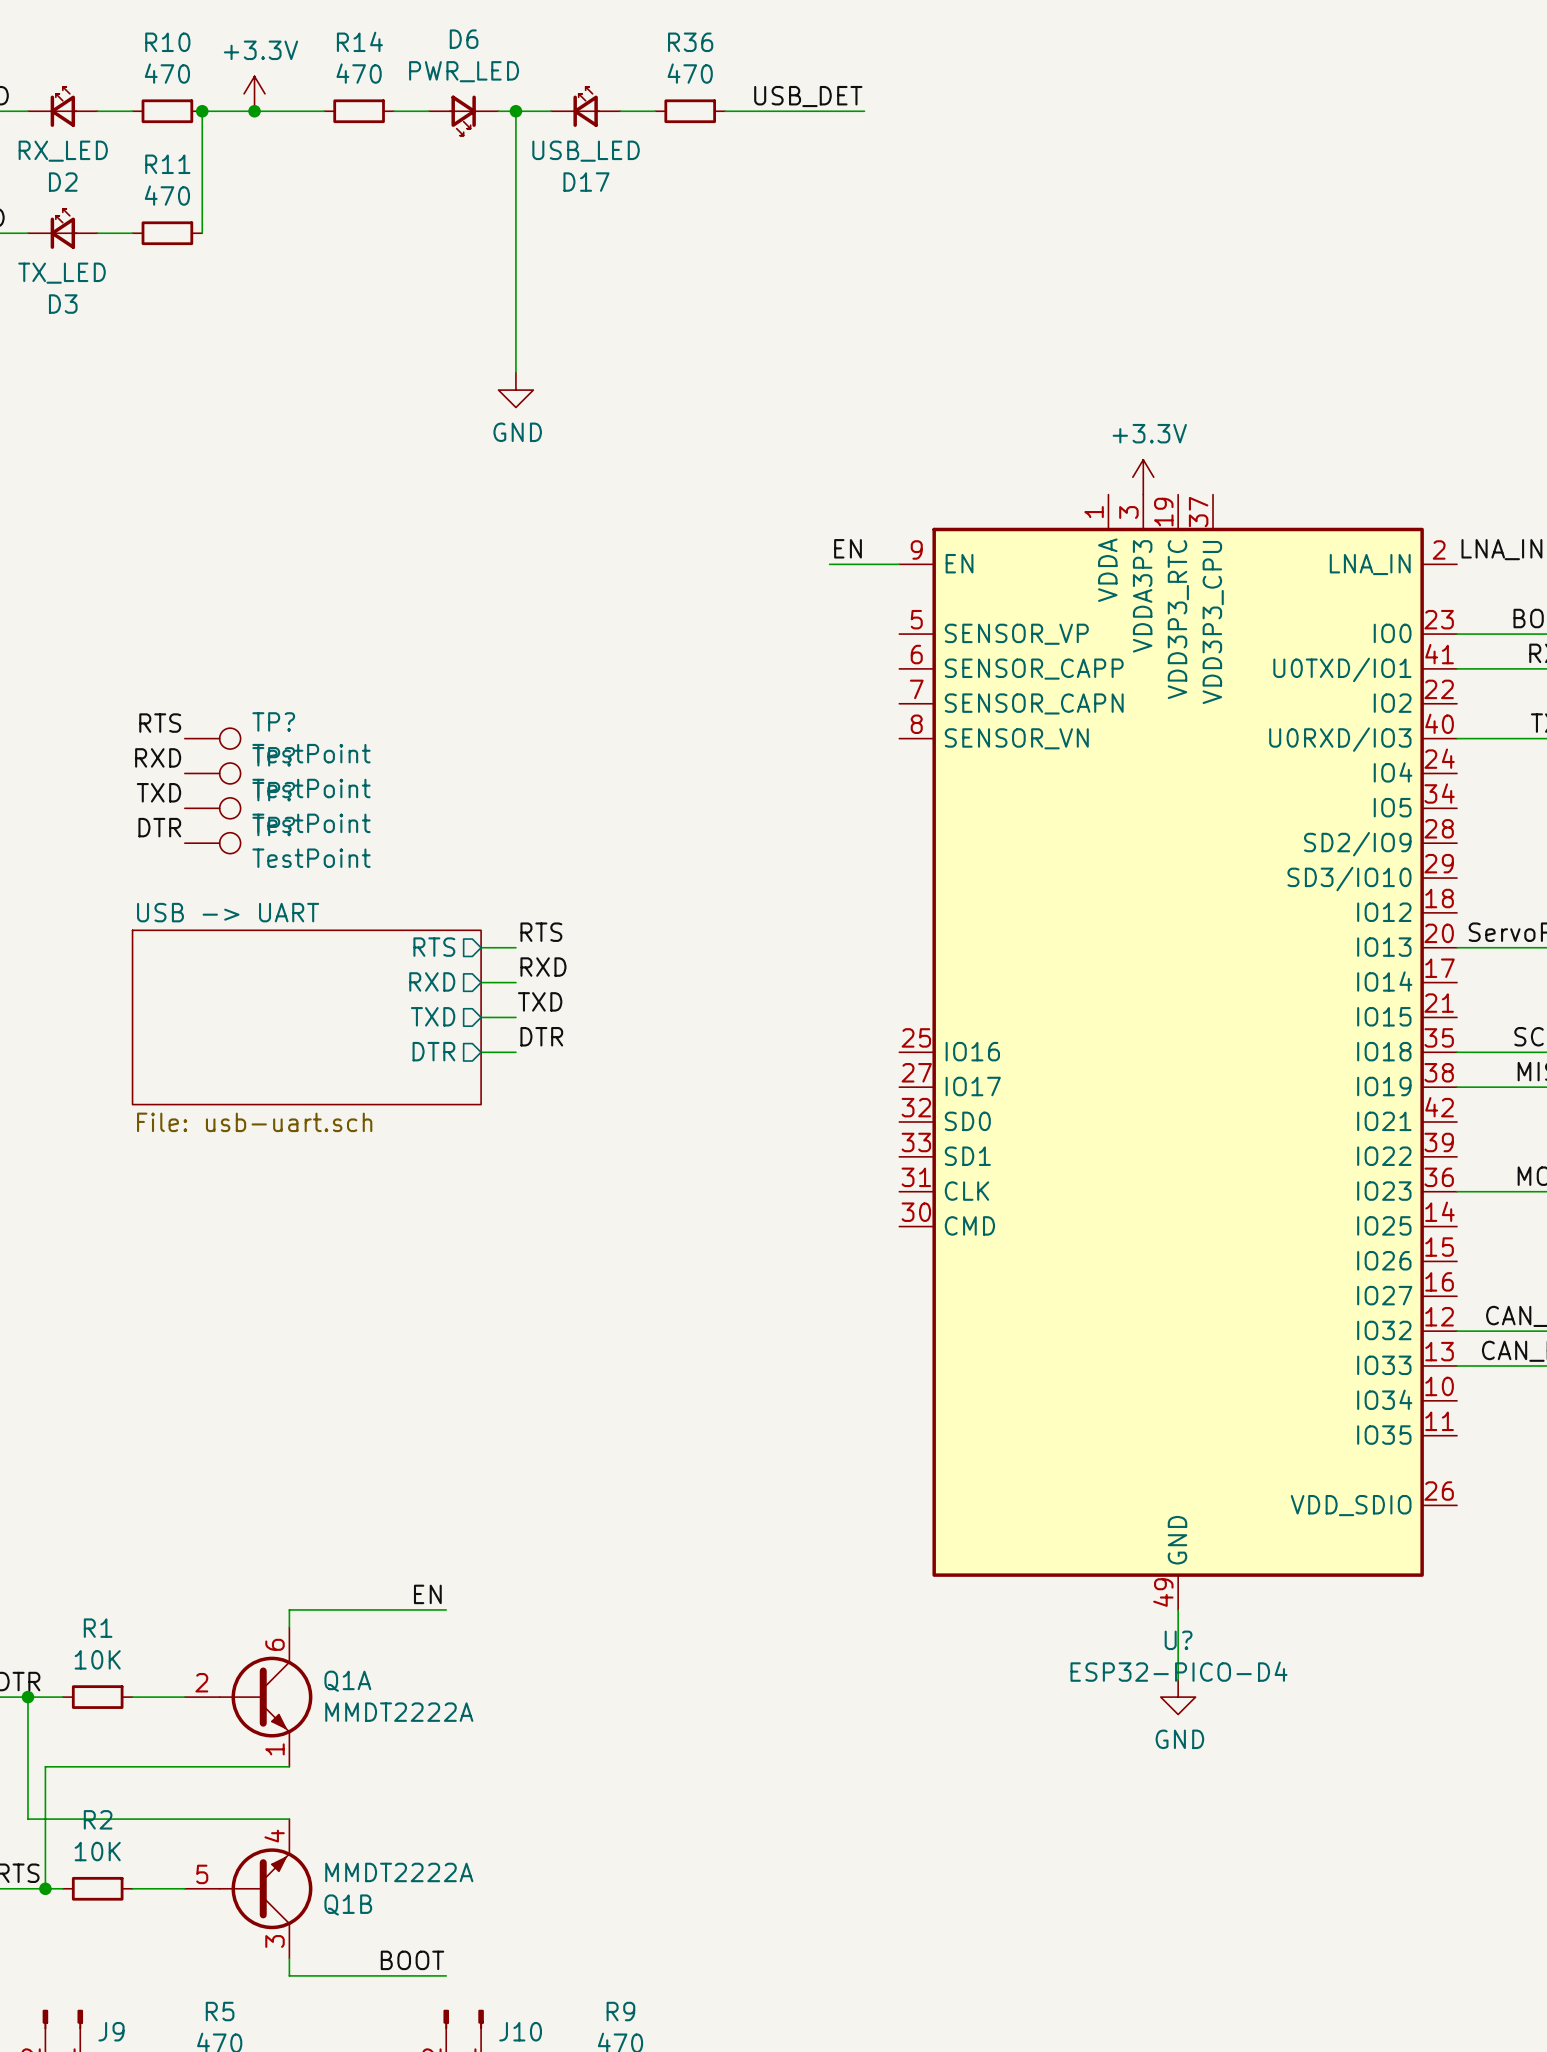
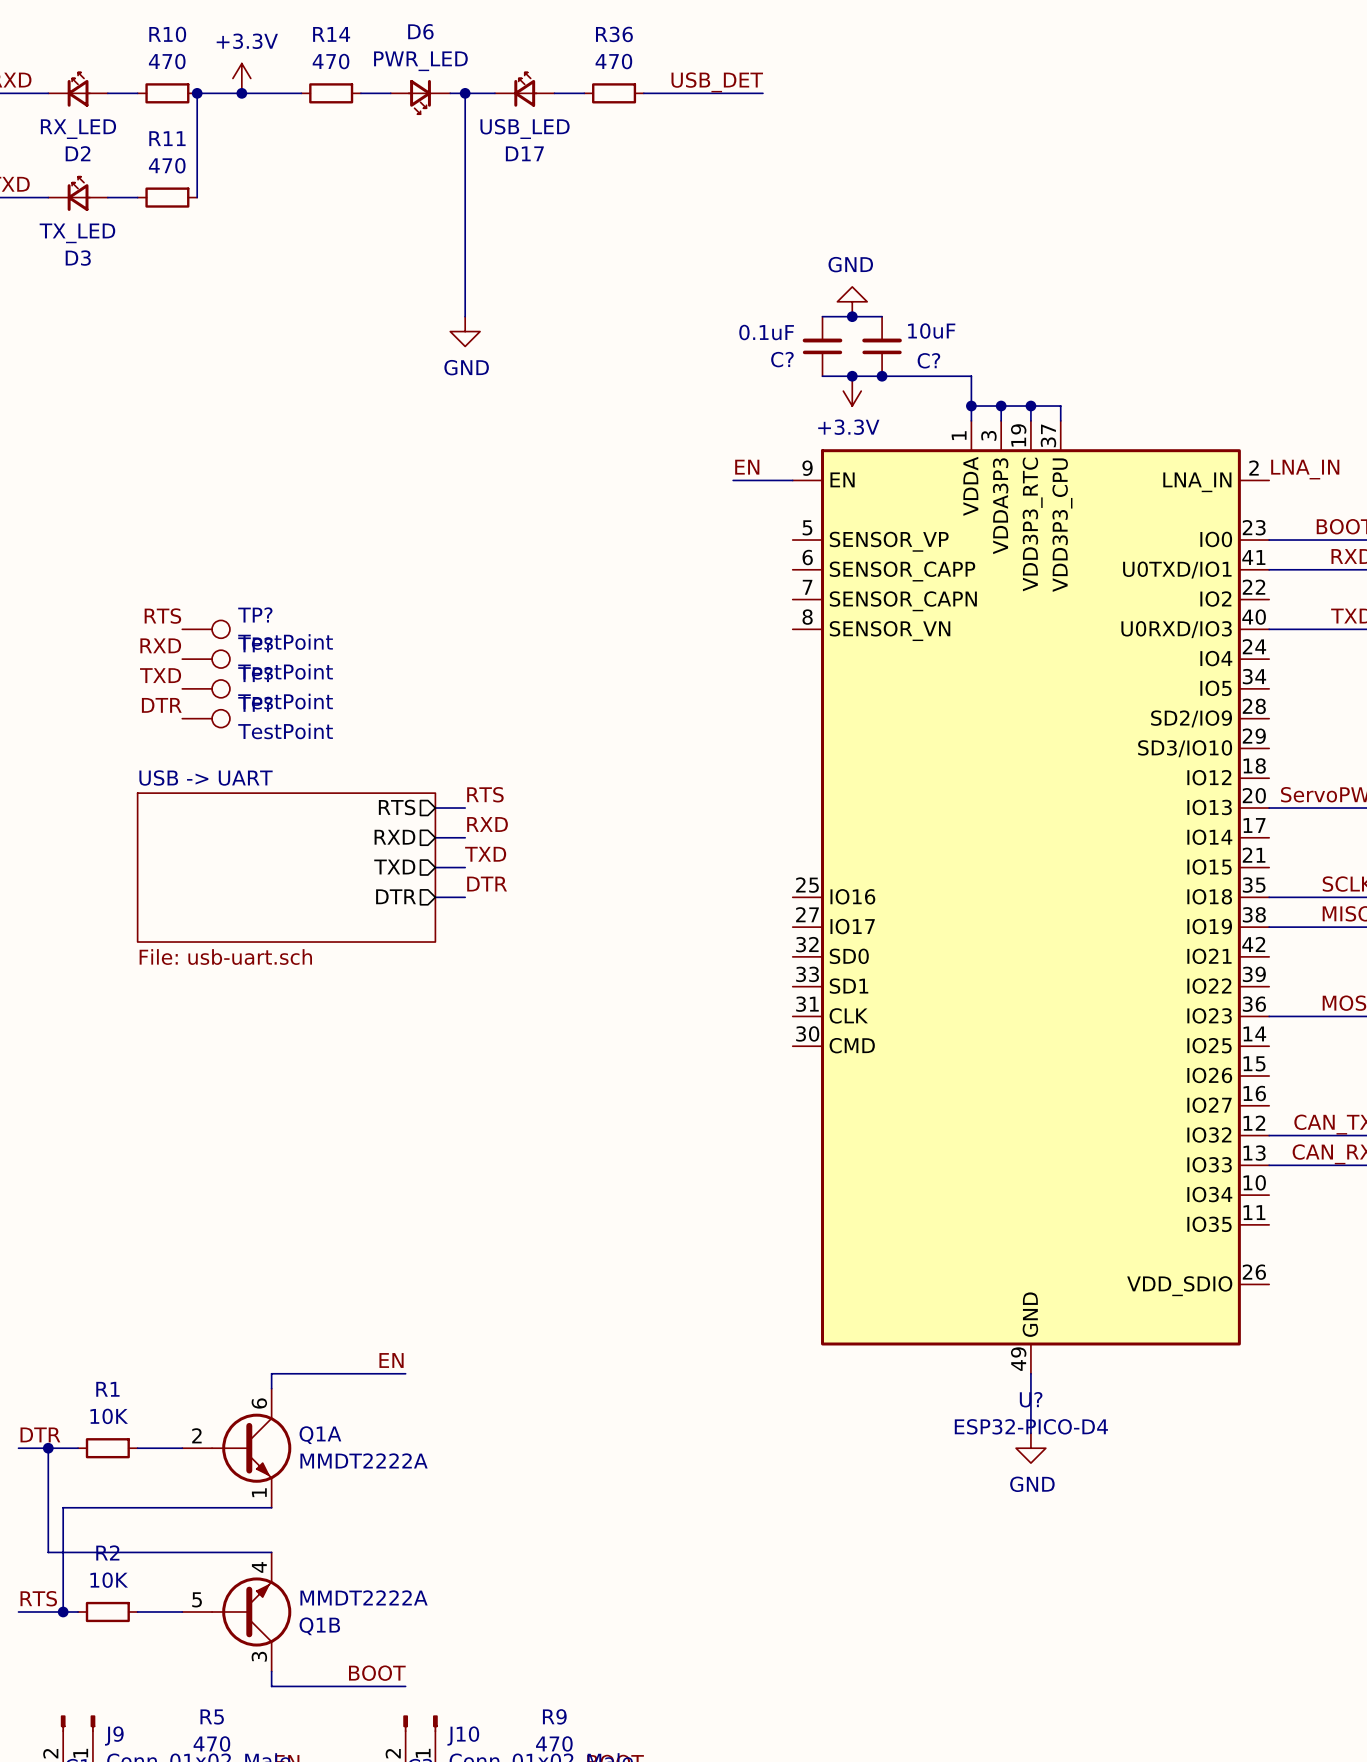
power symbol: none -> GND (852, 301)
wire: none -> (822, 316) (882, 316)
junction: none -> (852, 316)
C?: none -> 0.1uF (822, 346)
C?: none -> 10uF (882, 346)
wire: none -> (822, 376) (971, 376) (971, 420)
junction: none -> (852, 376)
junction: none -> (882, 376)
wire: none -> (971, 406) (1060, 406) (1060, 420)
junction: none -> (971, 406)
power symbol rotation: 0° (1143, 477) -> 180° (852, 391)
power symbol position: +3.3V (1143, 477) -> +3.3V (852, 391)
junction: none -> (1001, 406)
wire: none -> (1030, 406) (1030, 420)
junction: none -> (1030, 406)

